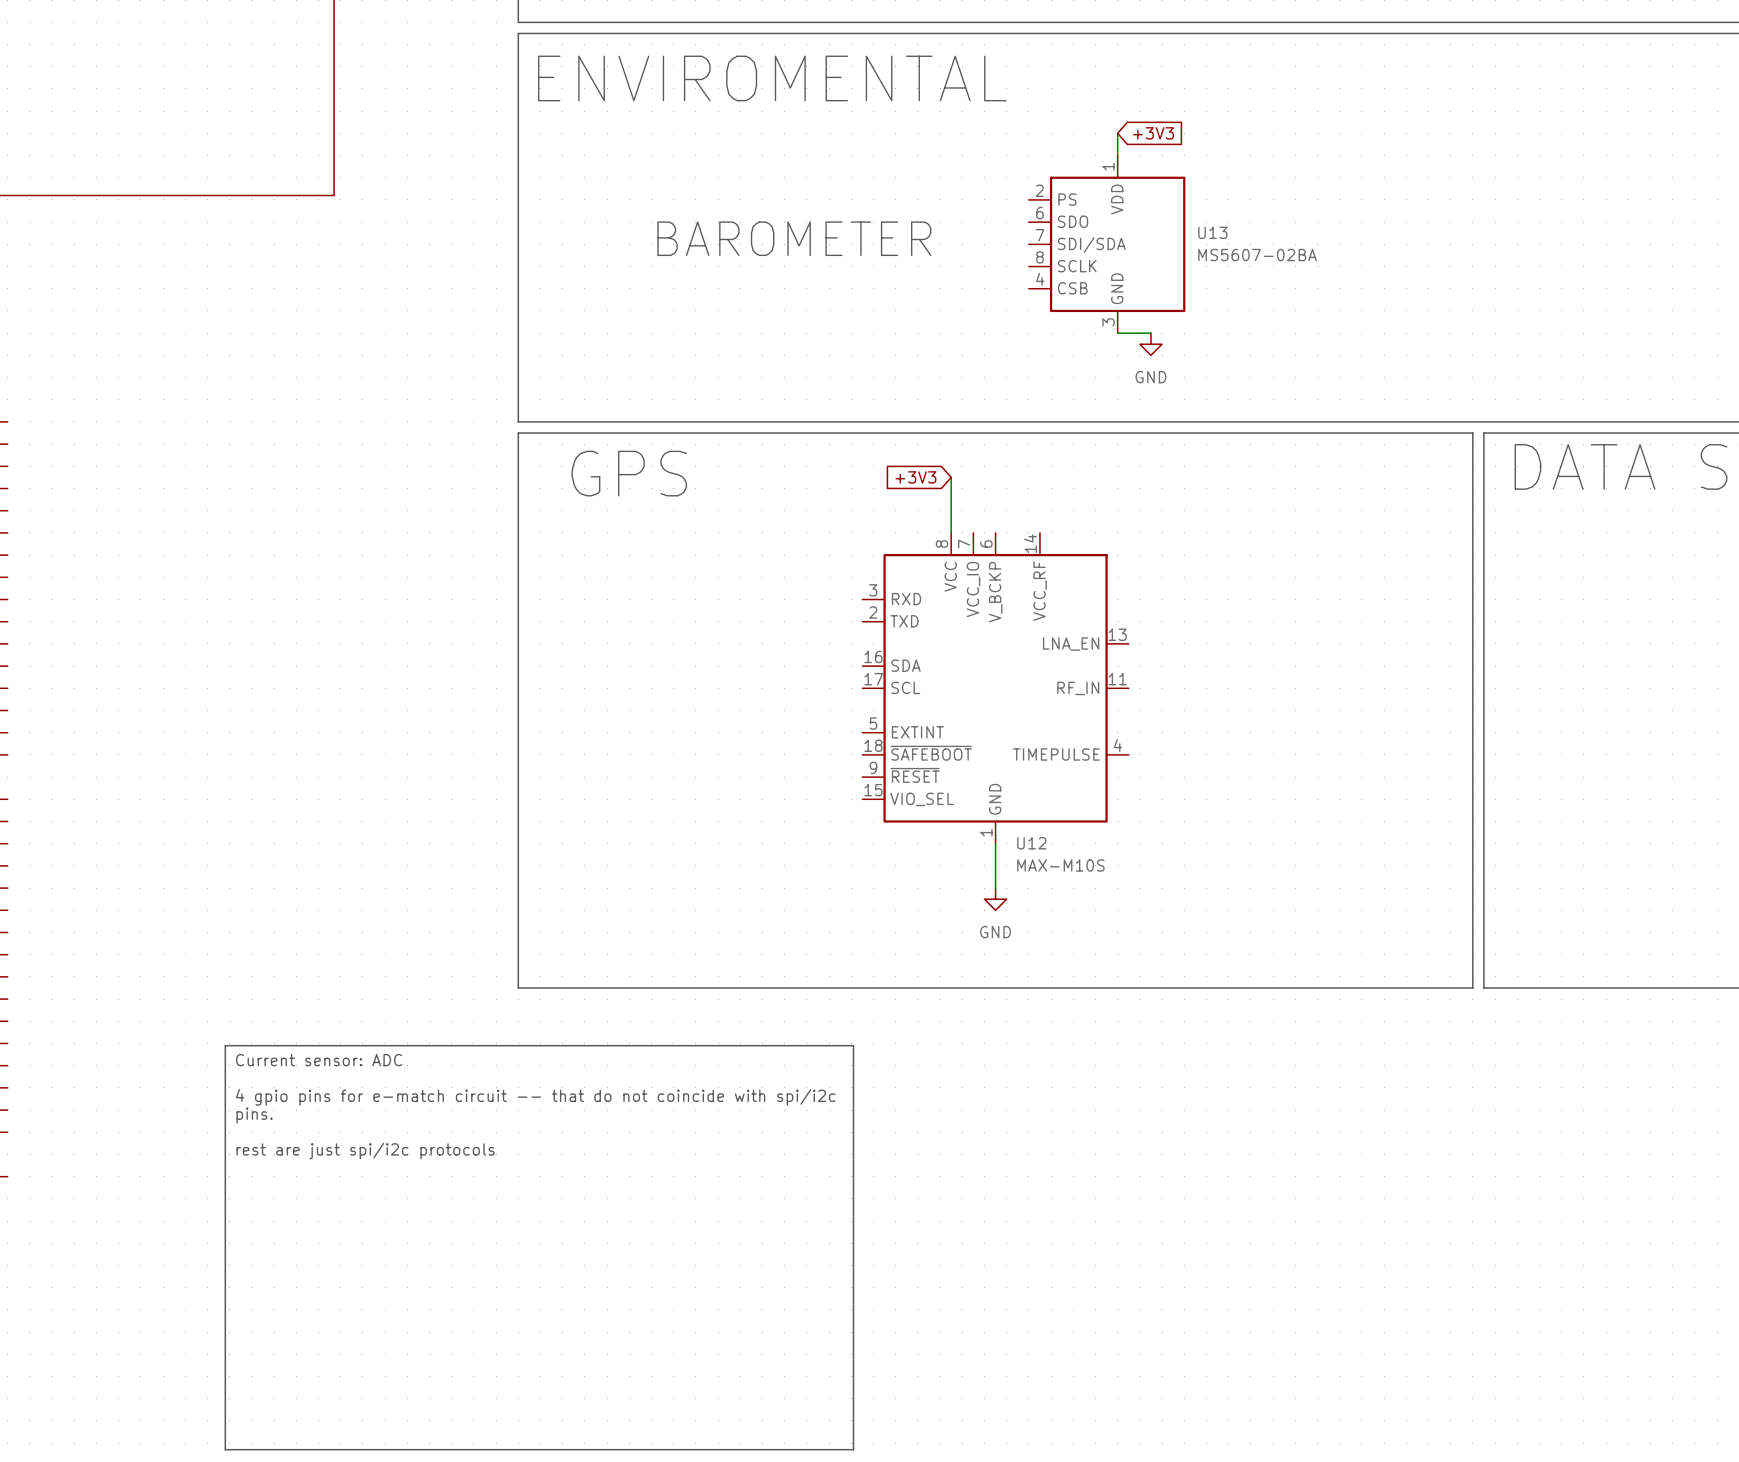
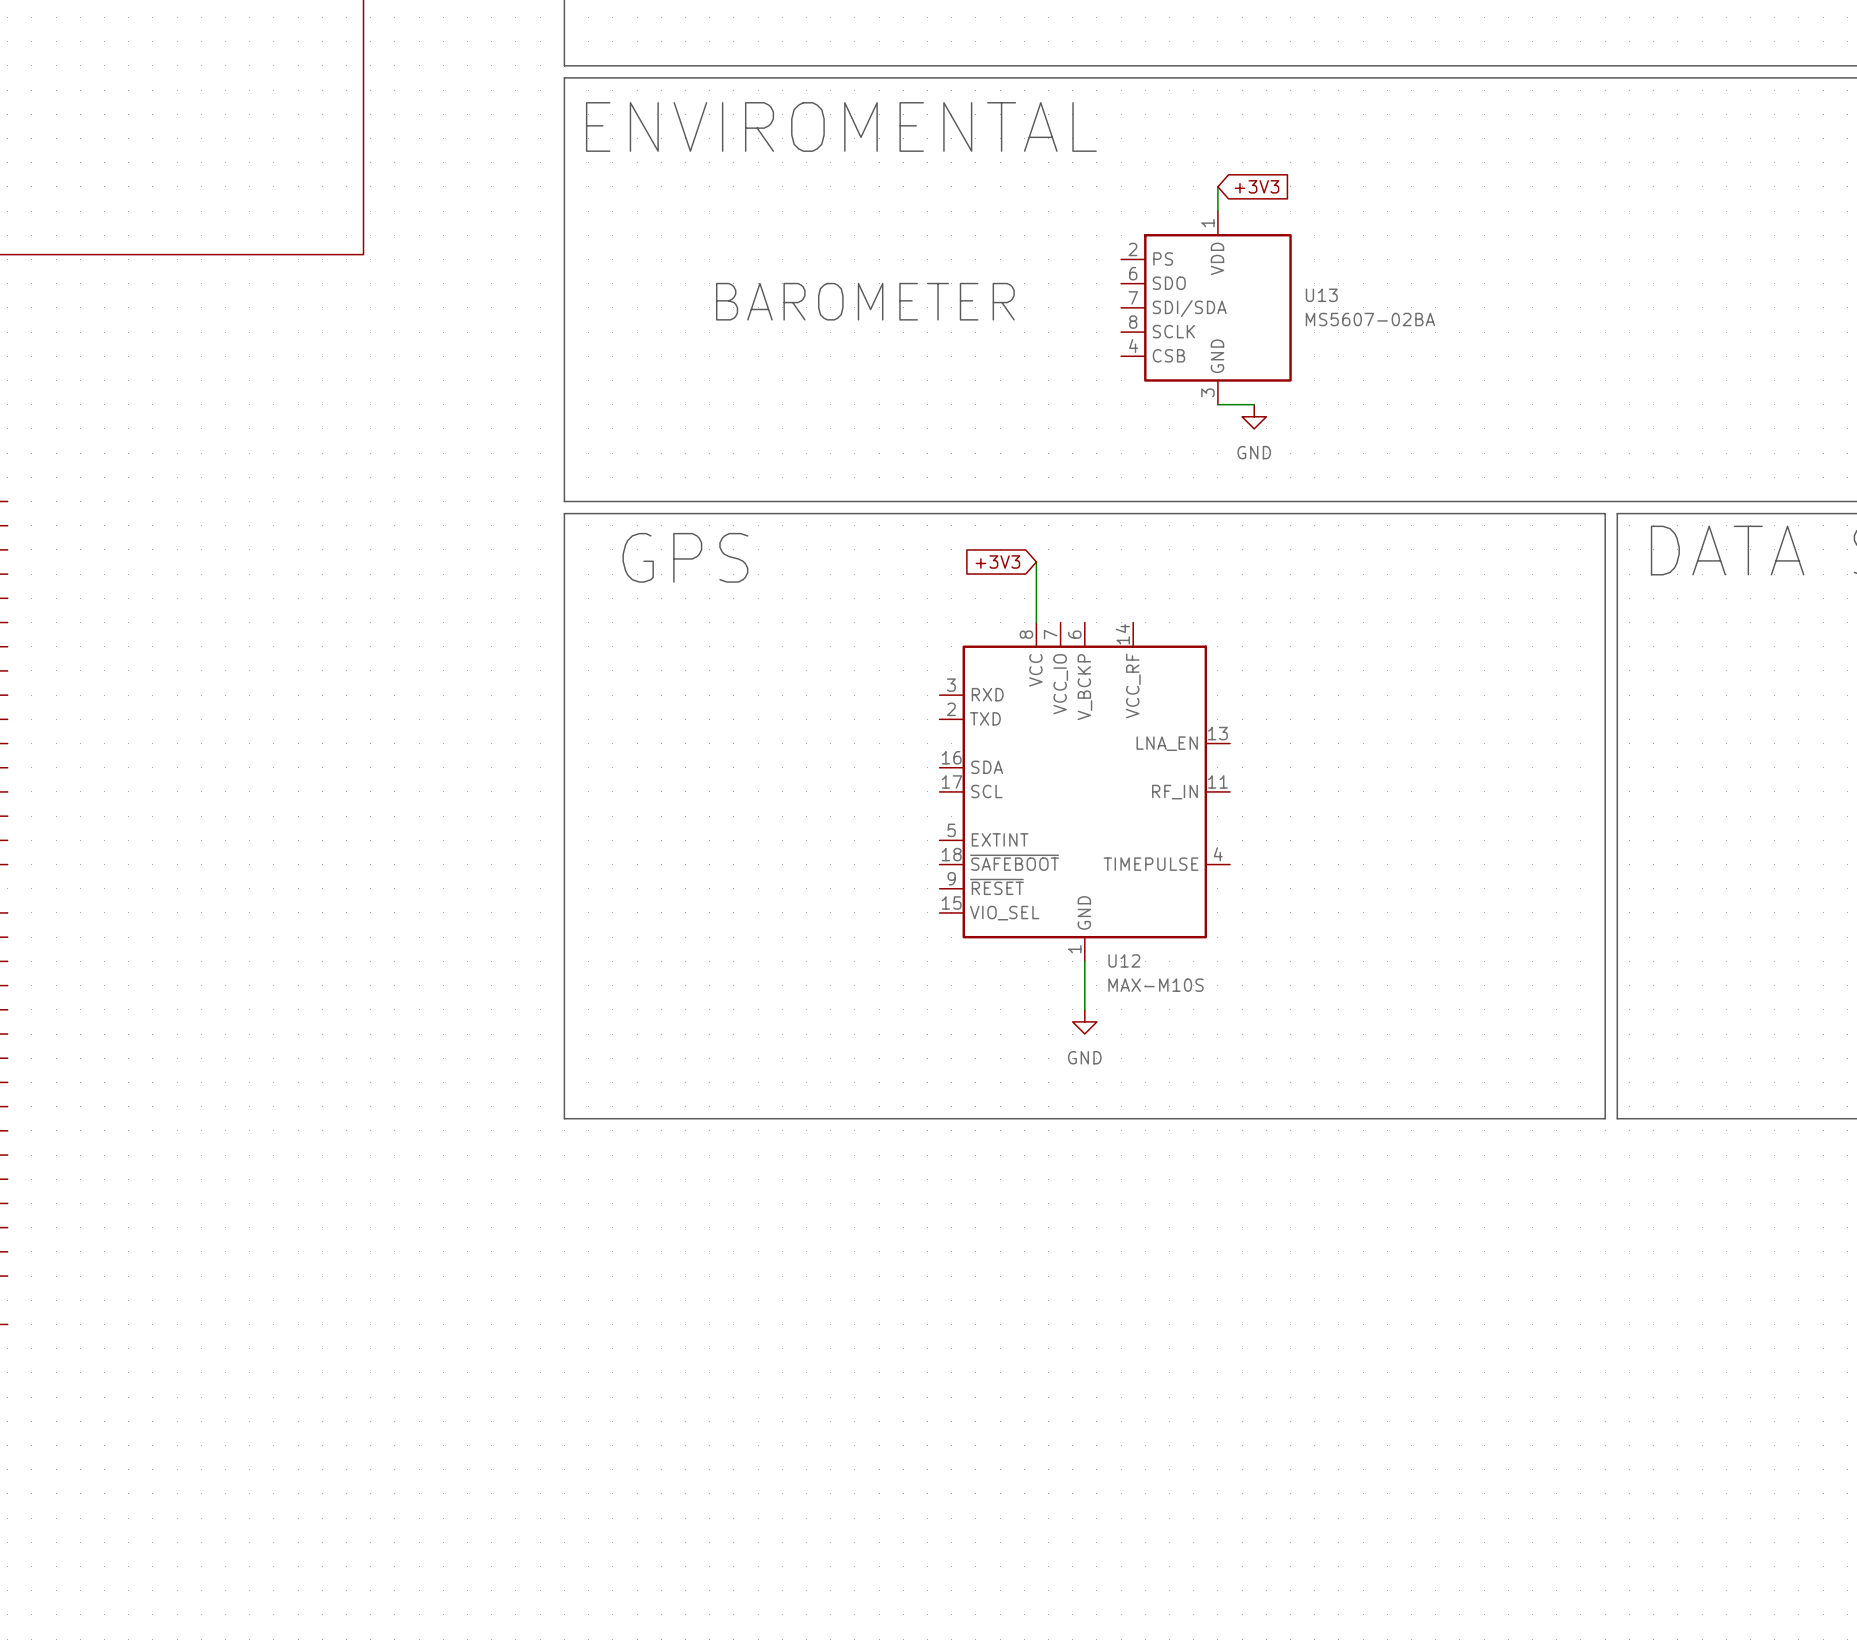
line: (225, 1045) (853, 1045) (853, 1449) (225, 1449) (225, 1045) -> none
text: Current sensor: ADC (319, 1060) -> none
text: 4 gpio pins for e-match circuit -- that do not coincide with spi/i2c (535, 1097) -> none
text: pins. (254, 1115) -> none
text: rest are just spi/i2c protocols (365, 1151) -> none

